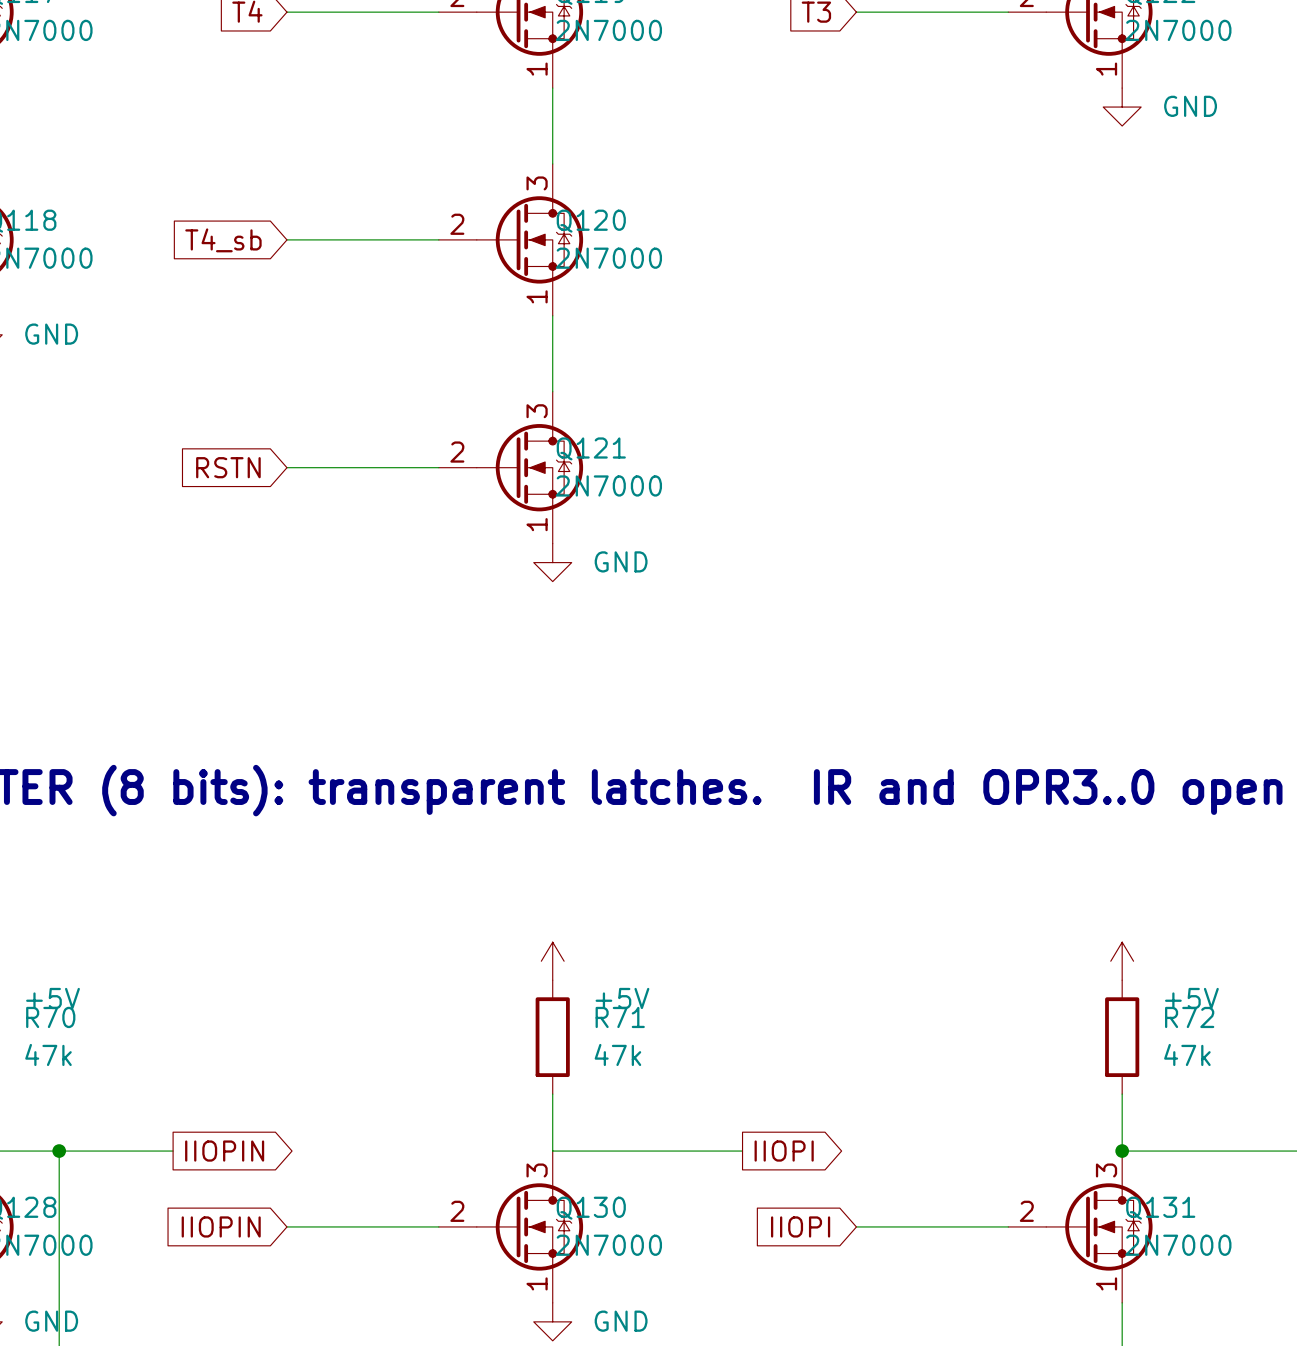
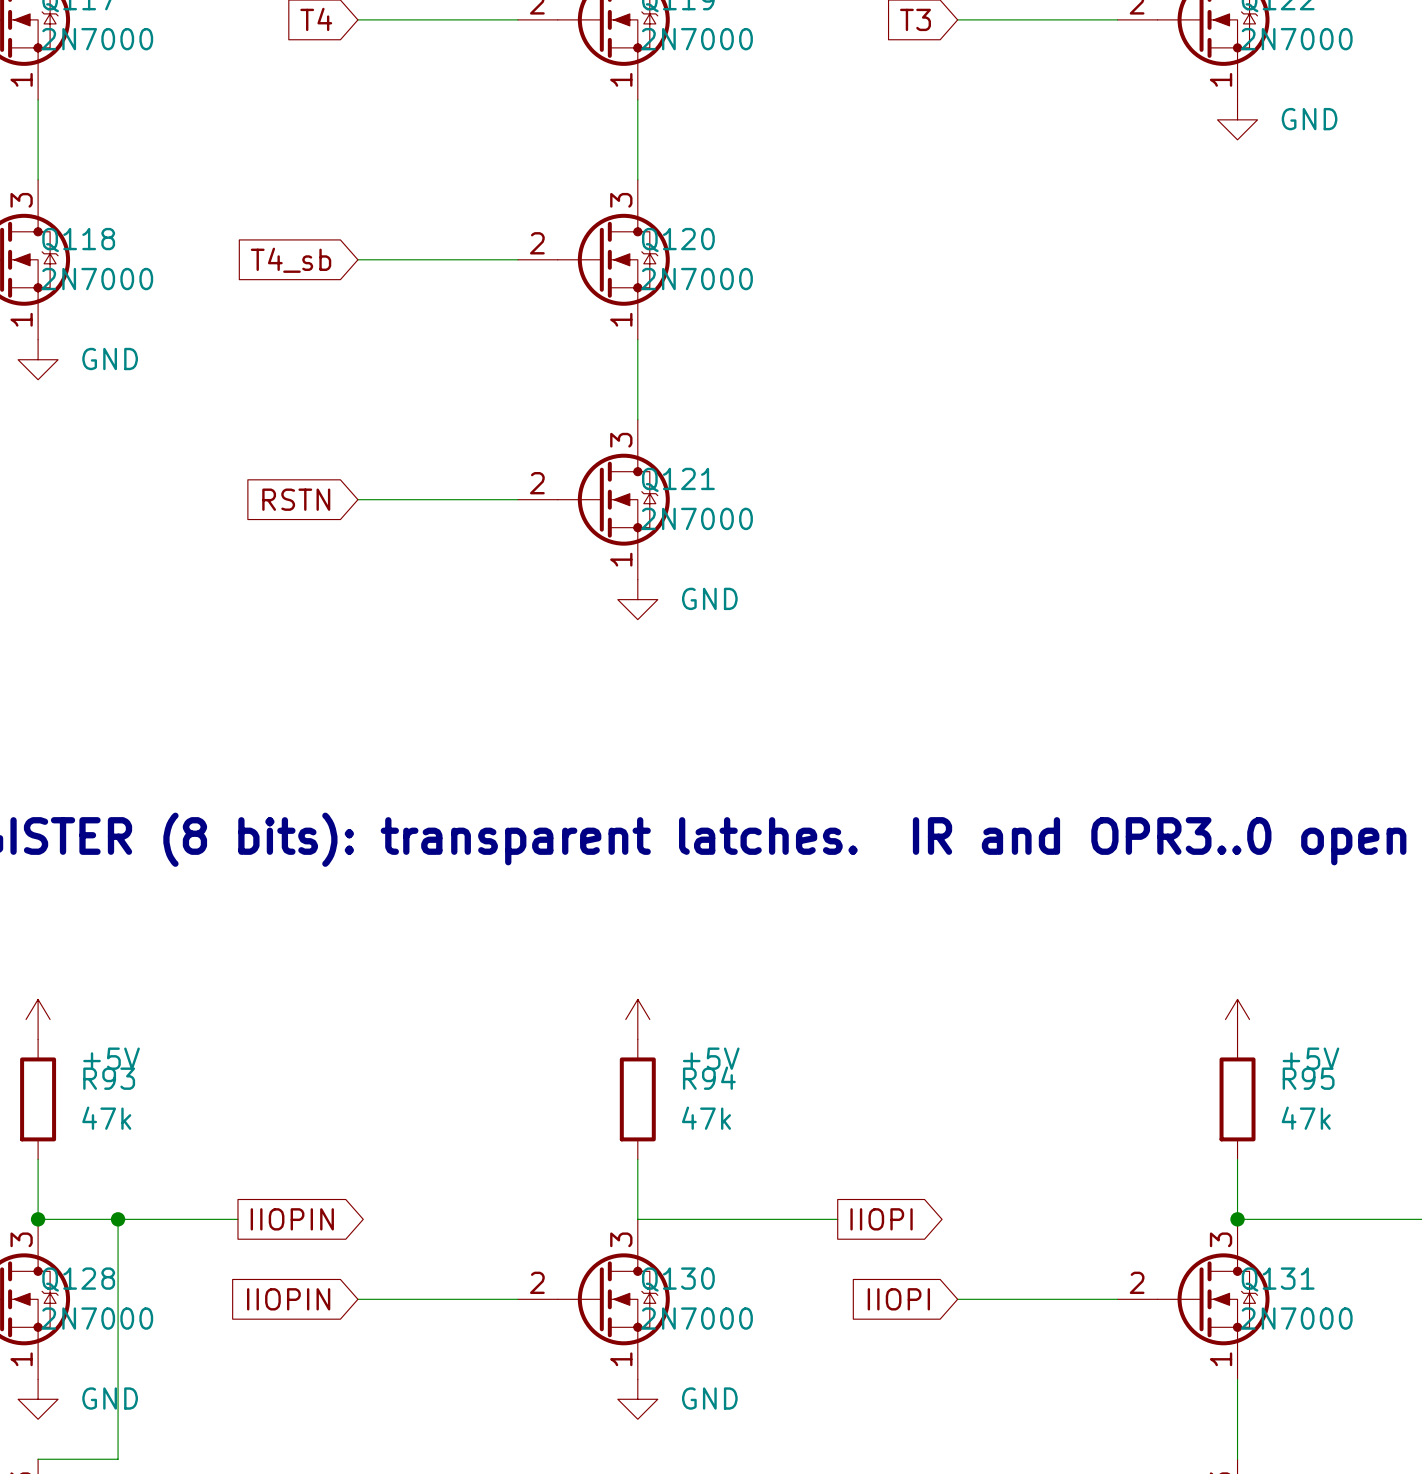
R70 name: R70 (50, 1017) -> R93 (109, 1078)
R71 name: R71 (620, 1017) -> R94 (709, 1078)
R72 name: R72 (1189, 1017) -> R95 (1308, 1078)

